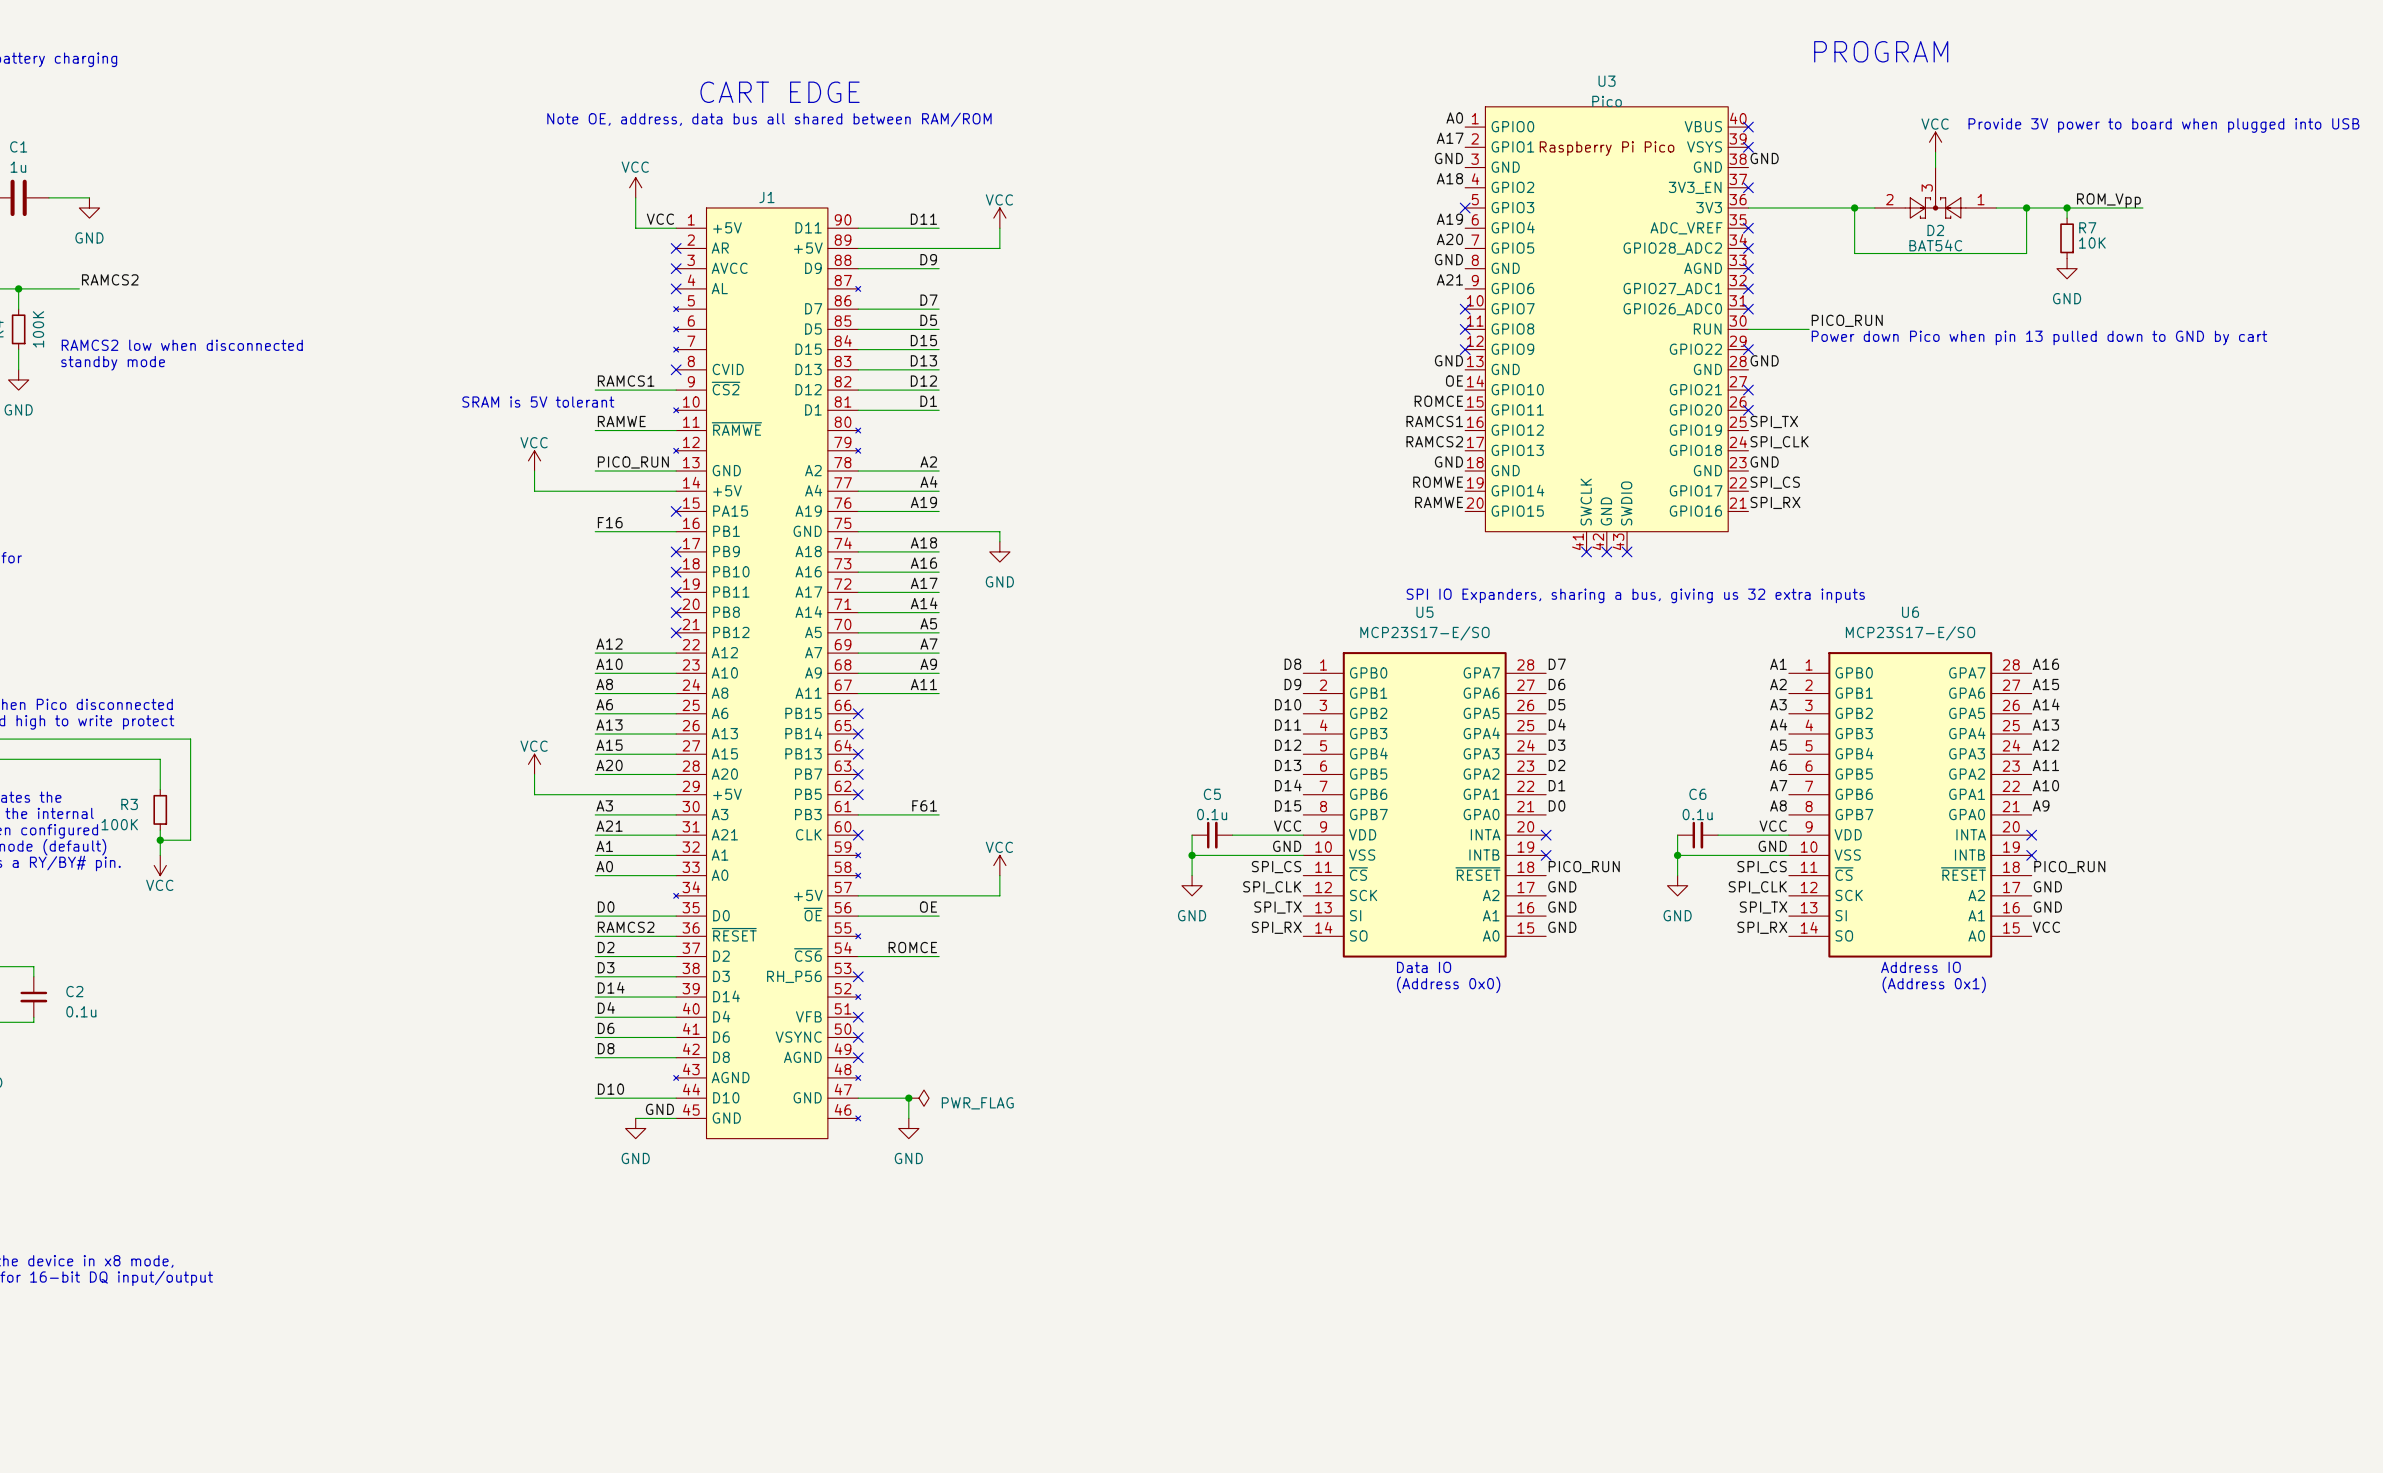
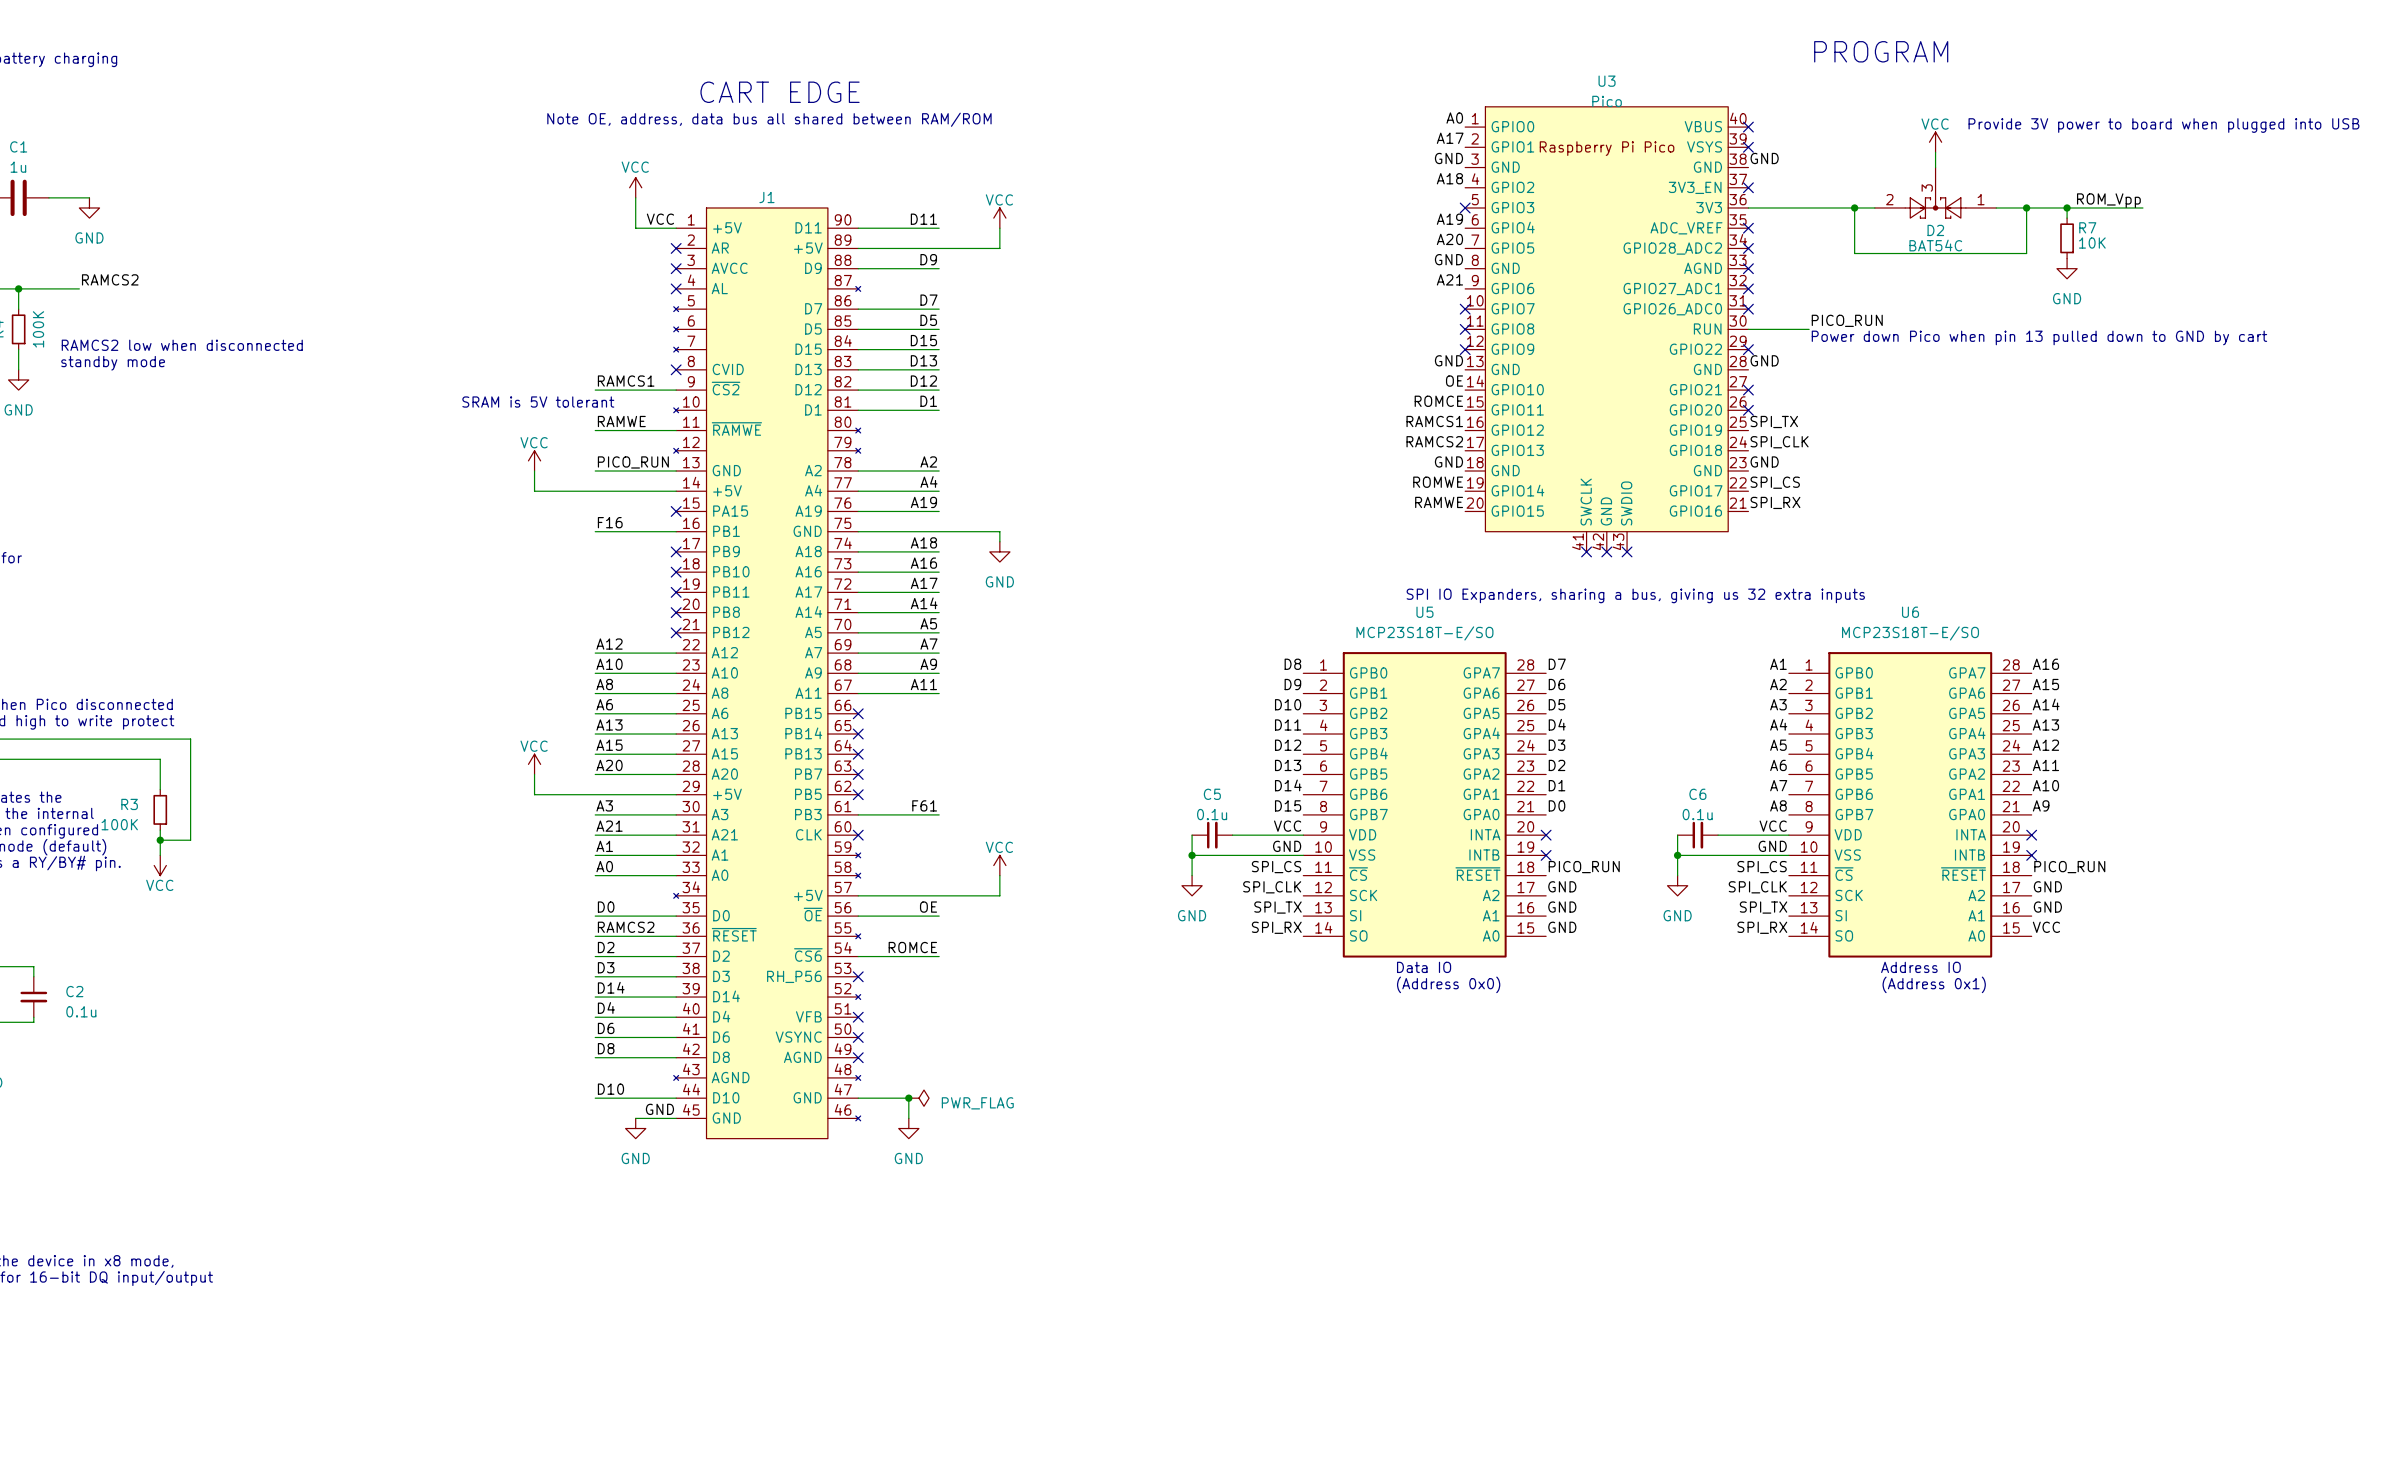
U5 value: MCP23S17-E/SO (1424, 633) -> MCP23S18T-E/SO (1424, 633)
U6 value: MCP23S17-E/SO (1910, 633) -> MCP23S18T-E/SO (1910, 633)

